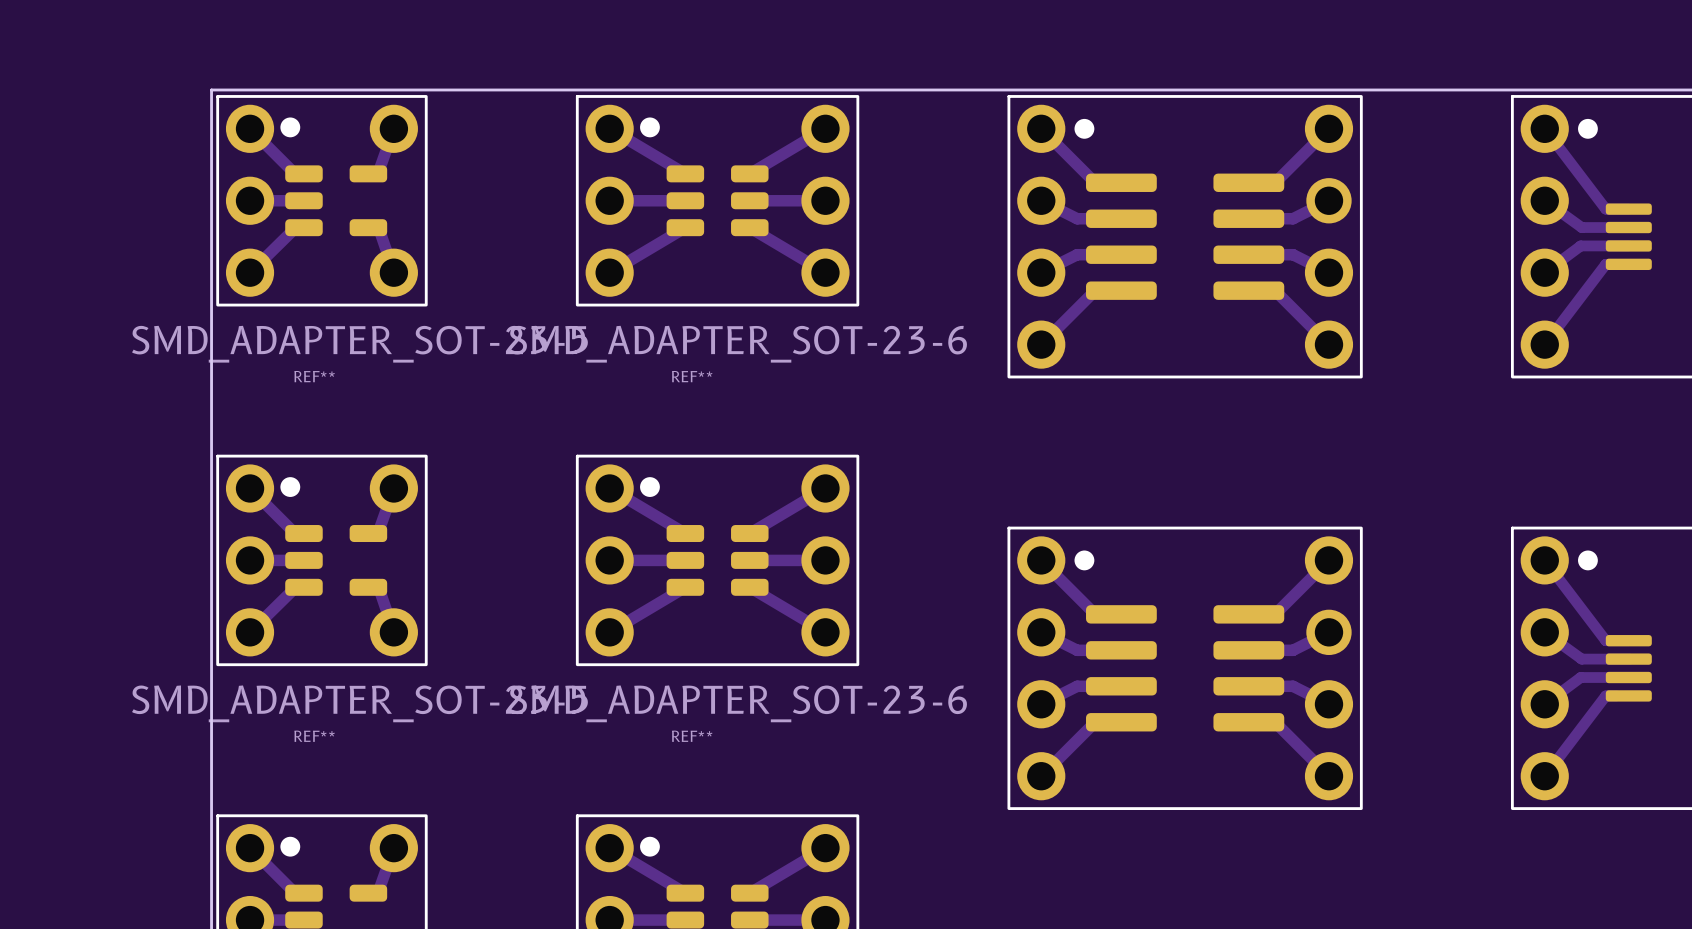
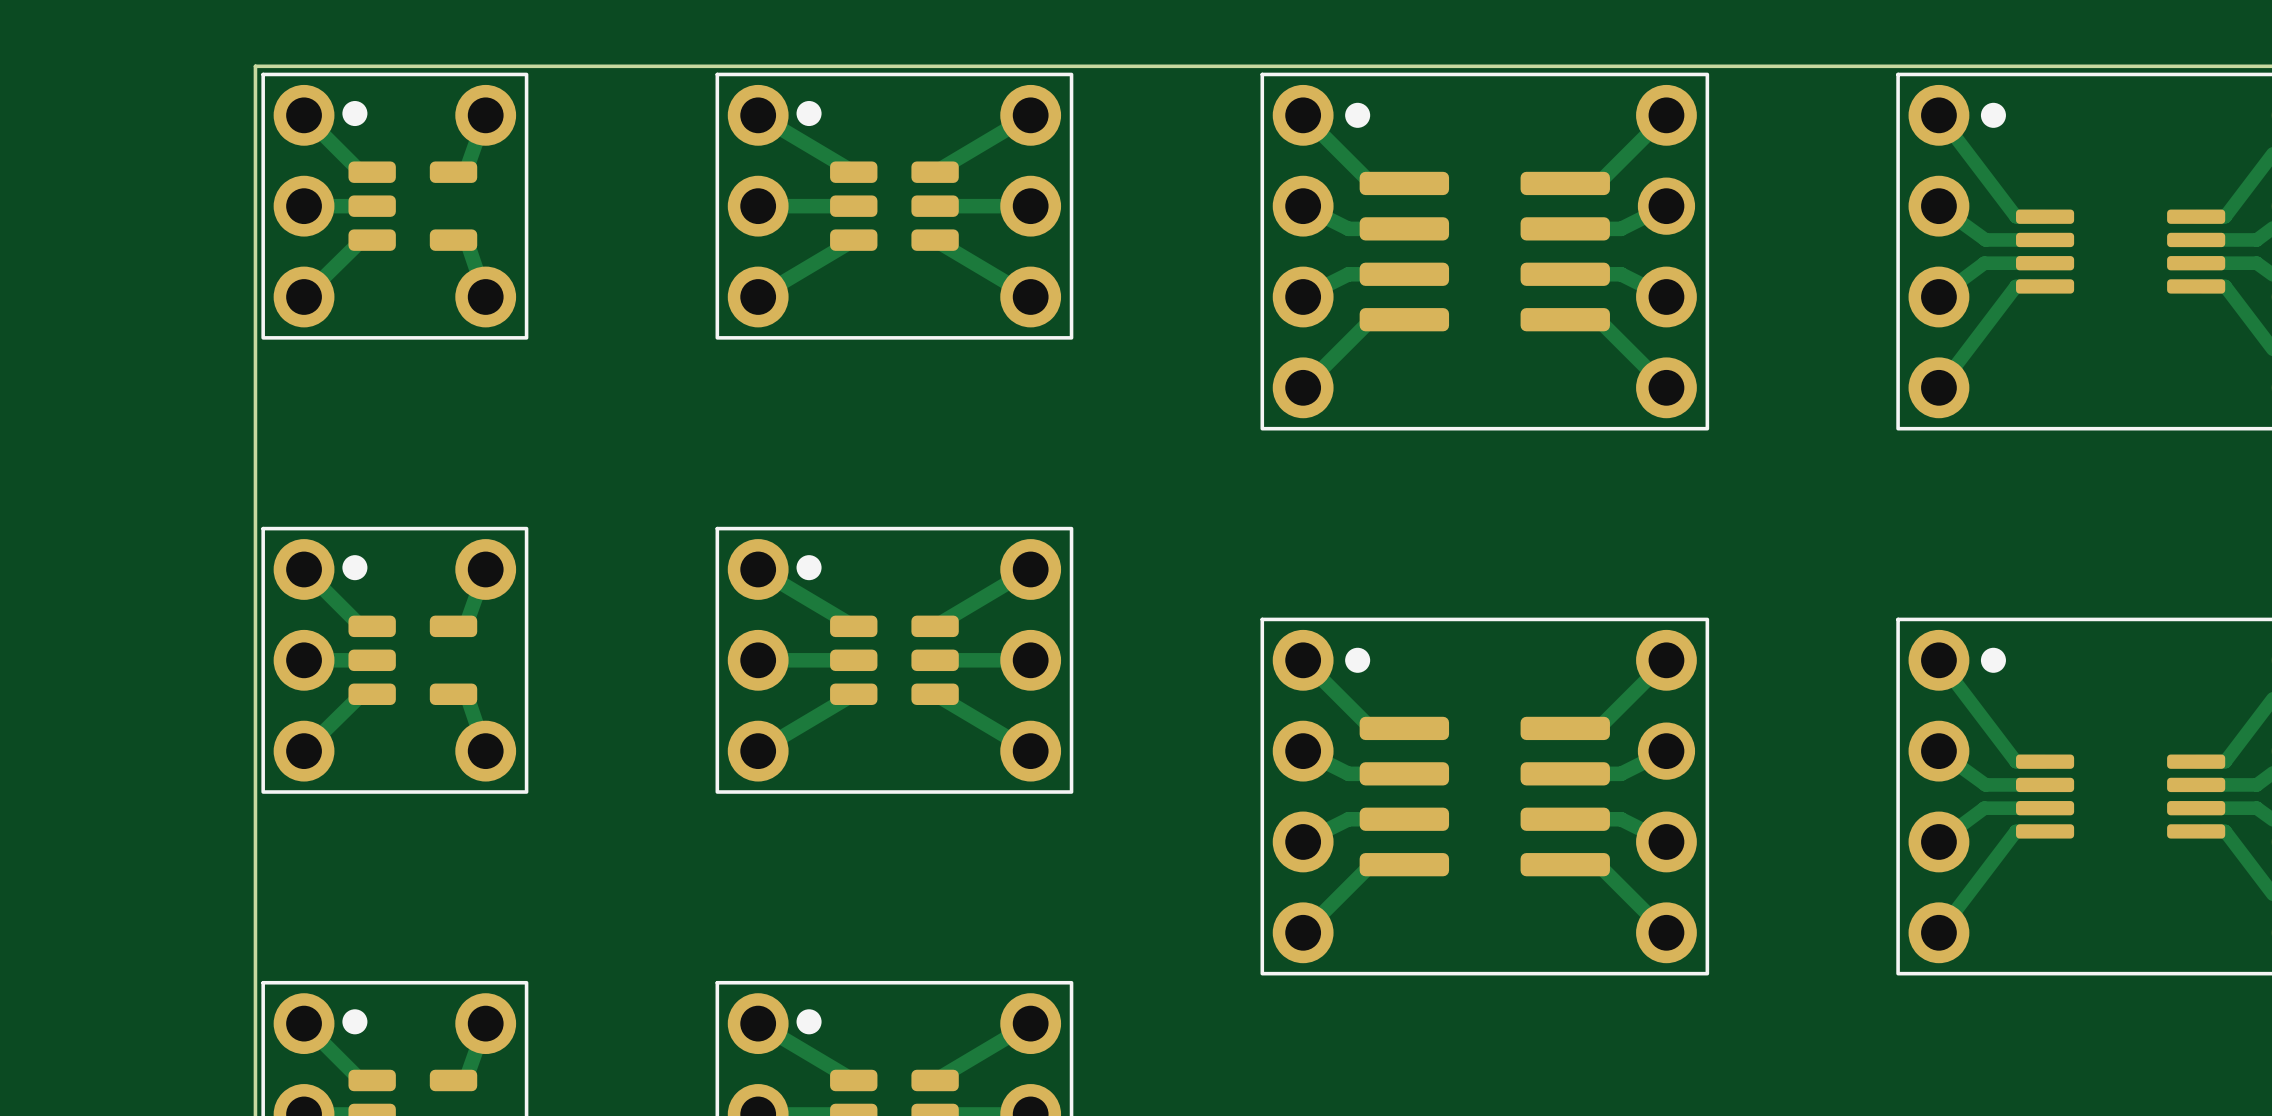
REF** value: SMD_ADAPTER_SOT-23-5 (359, 344) -> none
REF** value: SMD_ADAPTER_SOT-23-6 (738, 344) -> none
REF** name: REF** (314, 376) -> none
REF** name: REF** (692, 376) -> none
REF** value: SMD_ADAPTER_SOT-23-5 (359, 703) -> none
REF** value: SMD_ADAPTER_SOT-23-6 (738, 703) -> none
REF** name: REF** (314, 736) -> none
REF** name: REF** (692, 736) -> none

